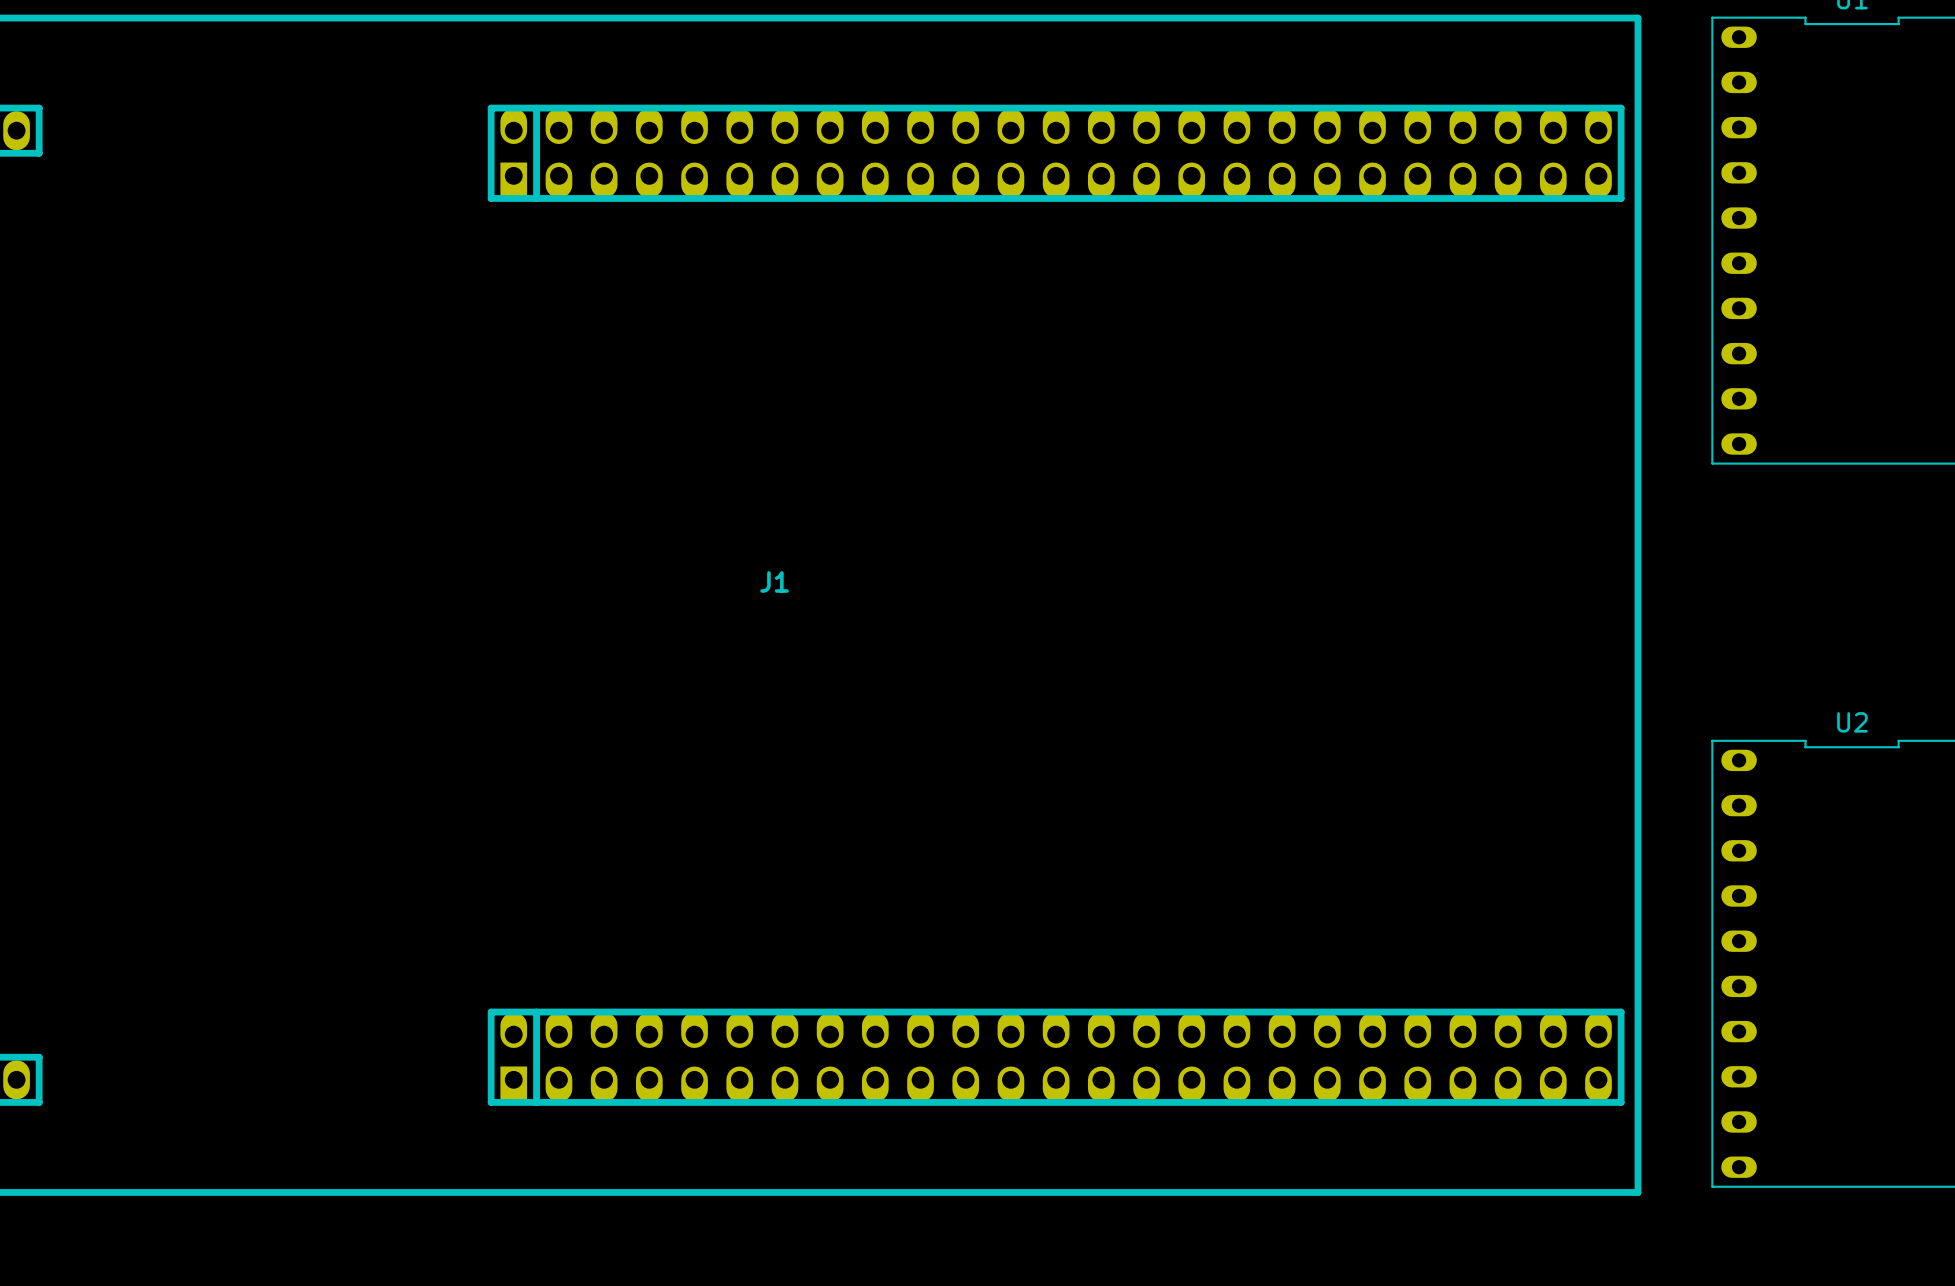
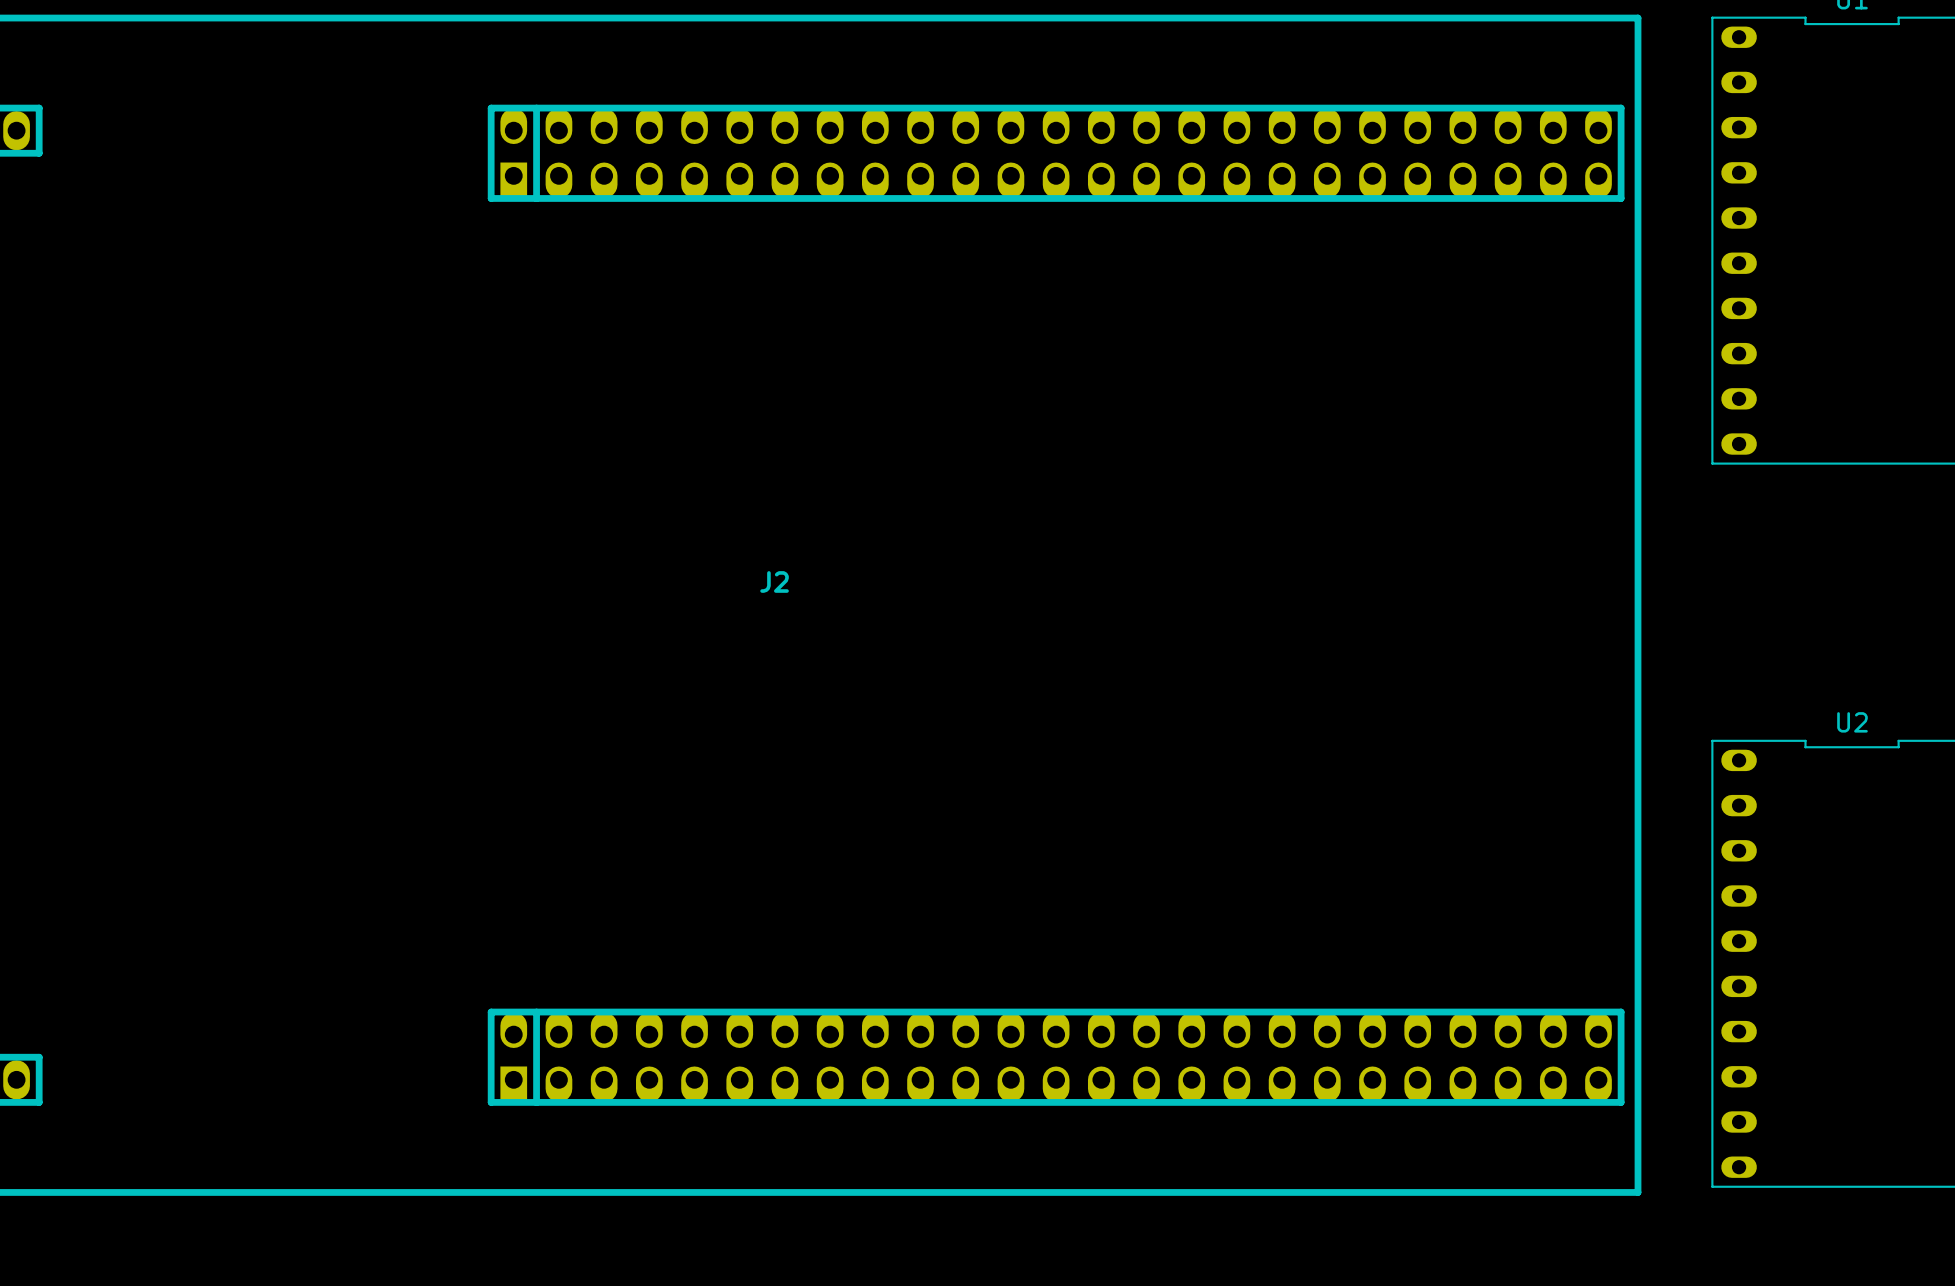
J1 name: J1 (774, 581) -> J2 (774, 581)

